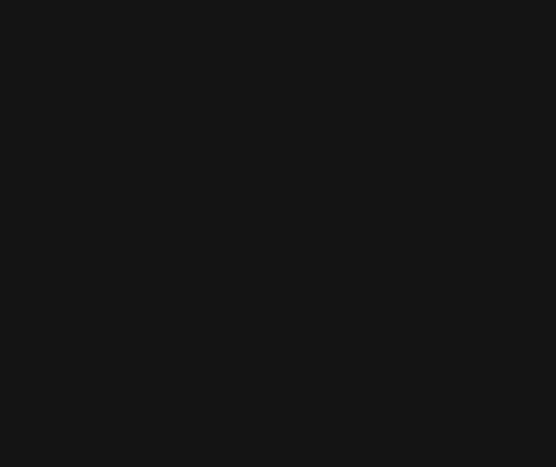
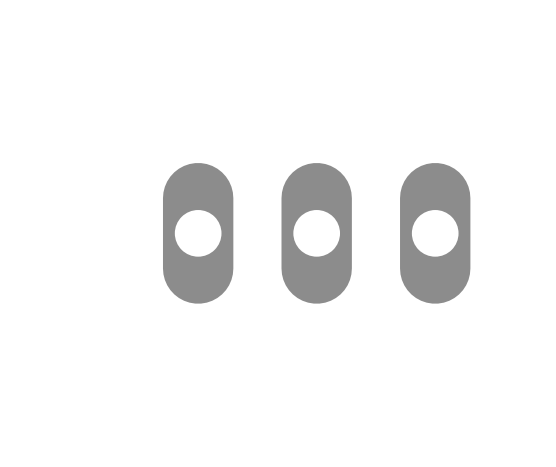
part: none -> (316, 233)

